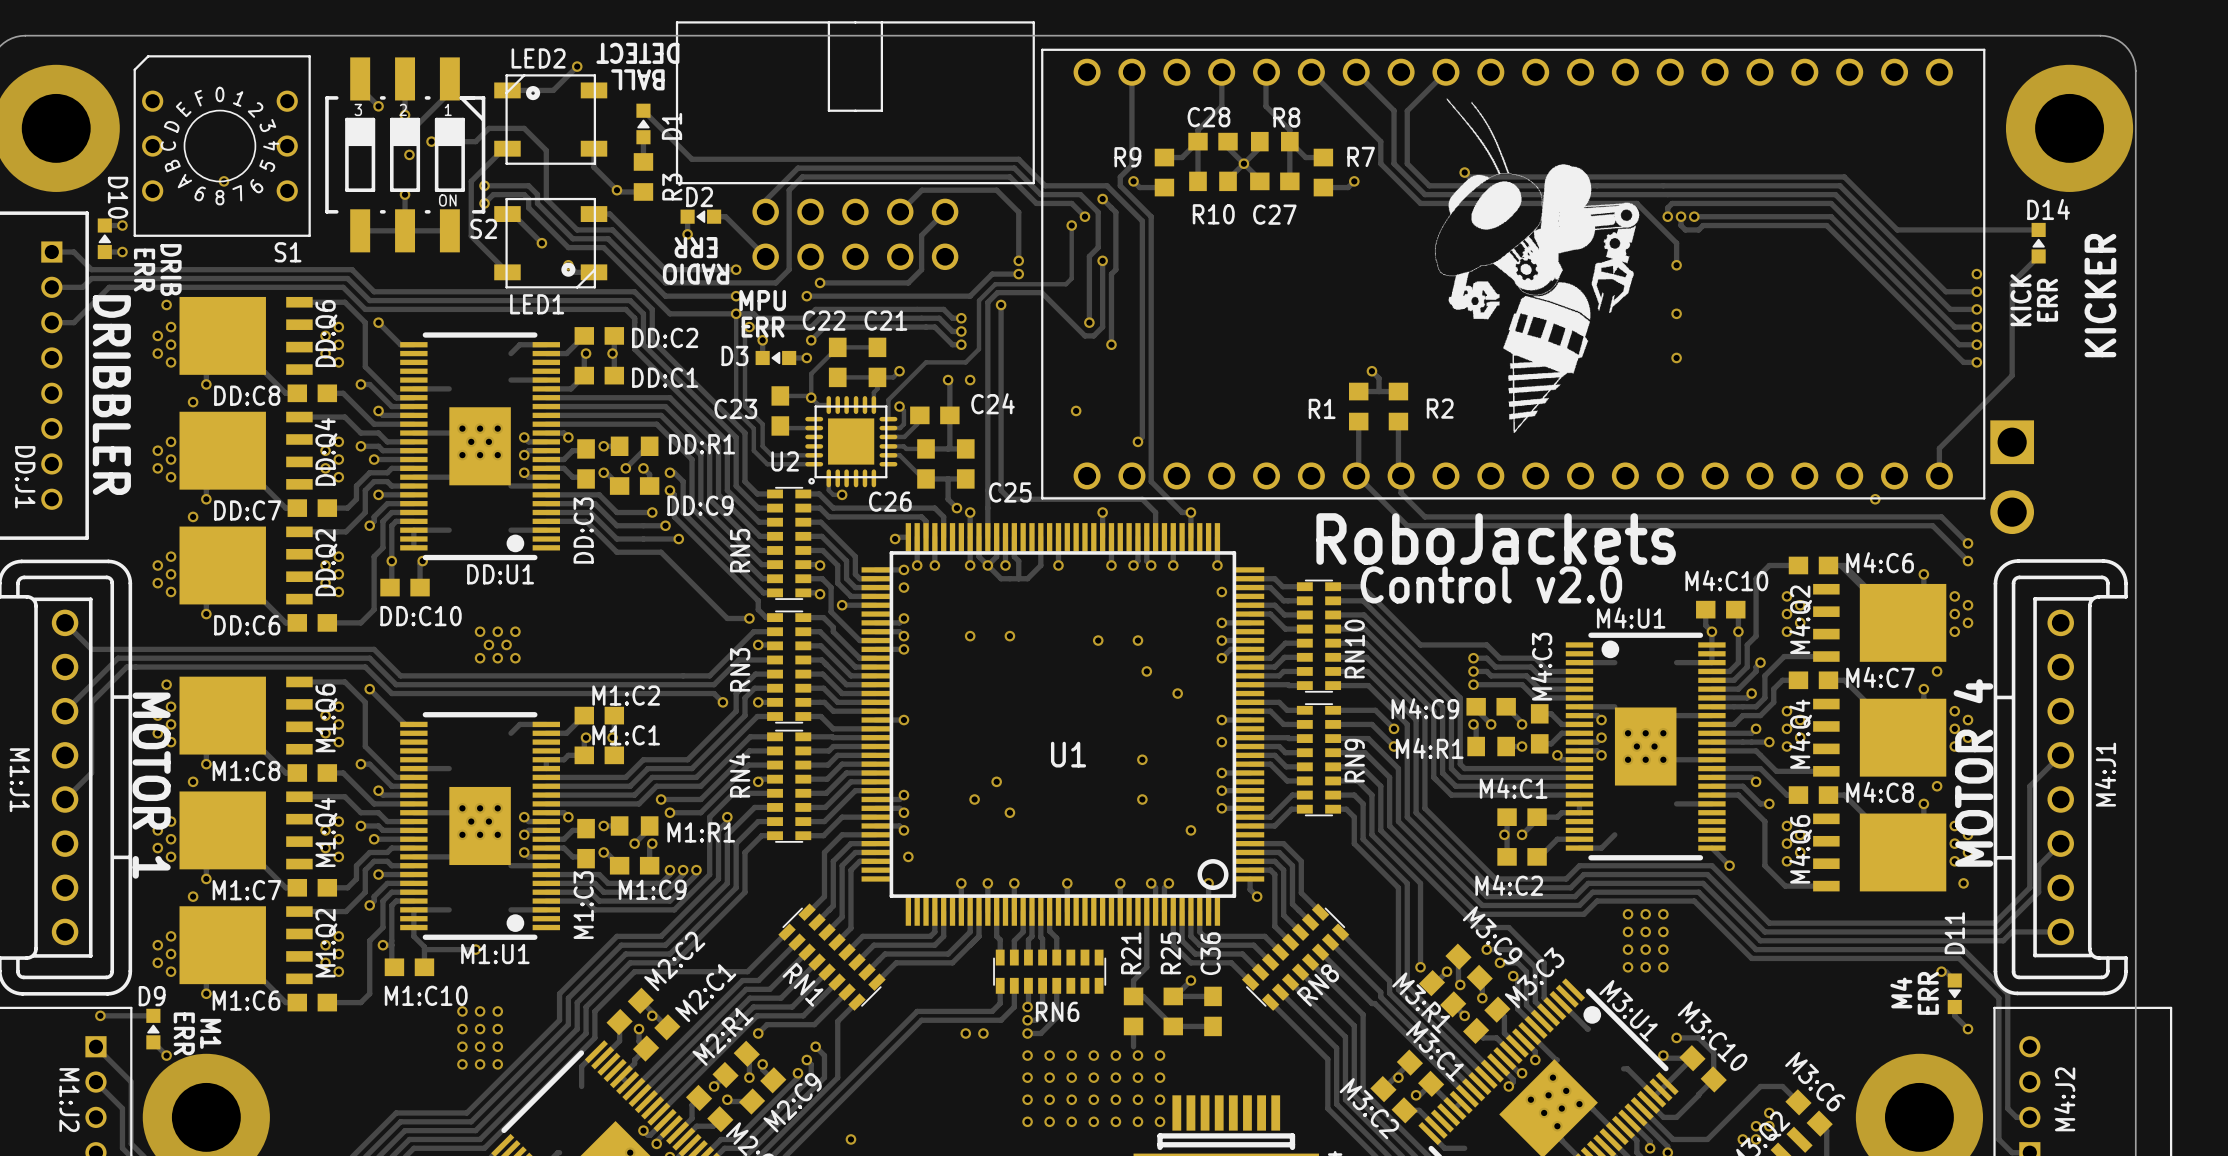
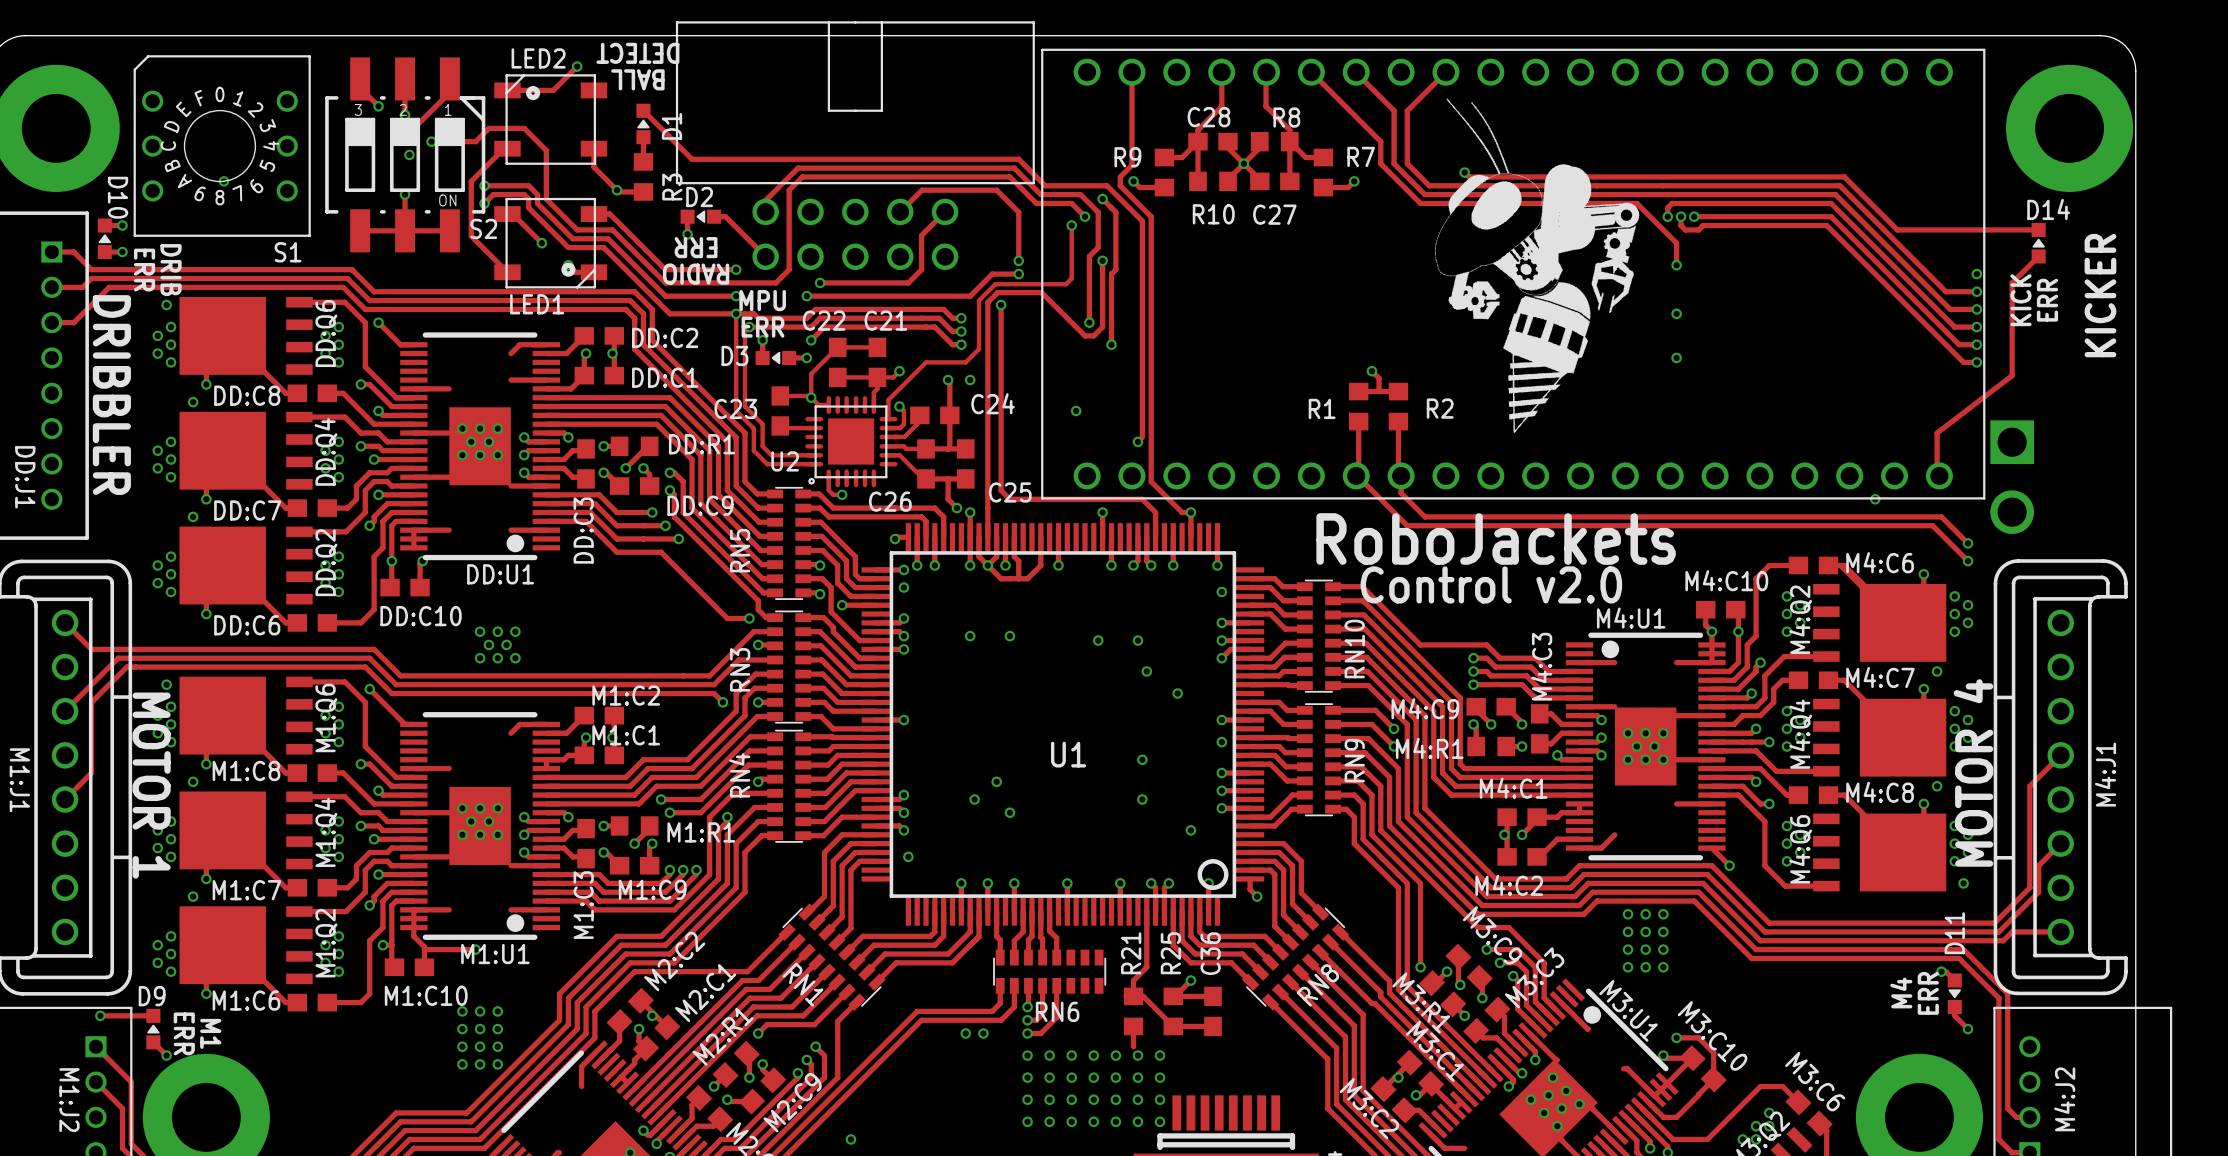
track: (2012, 375) (1939, 448) (1939, 475) -> (2012, 375) (1937, 433) (1937, 473) (1939, 475)

